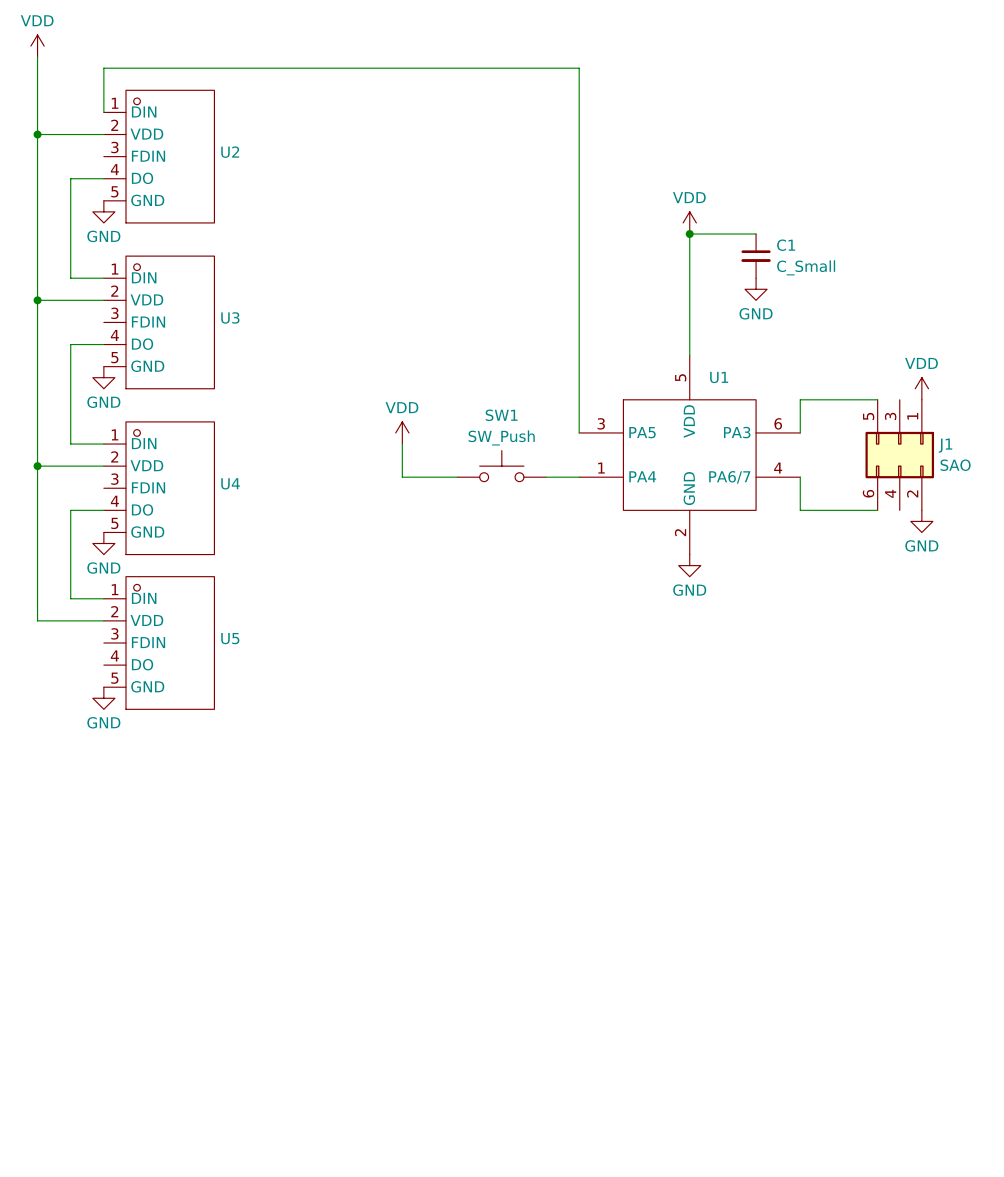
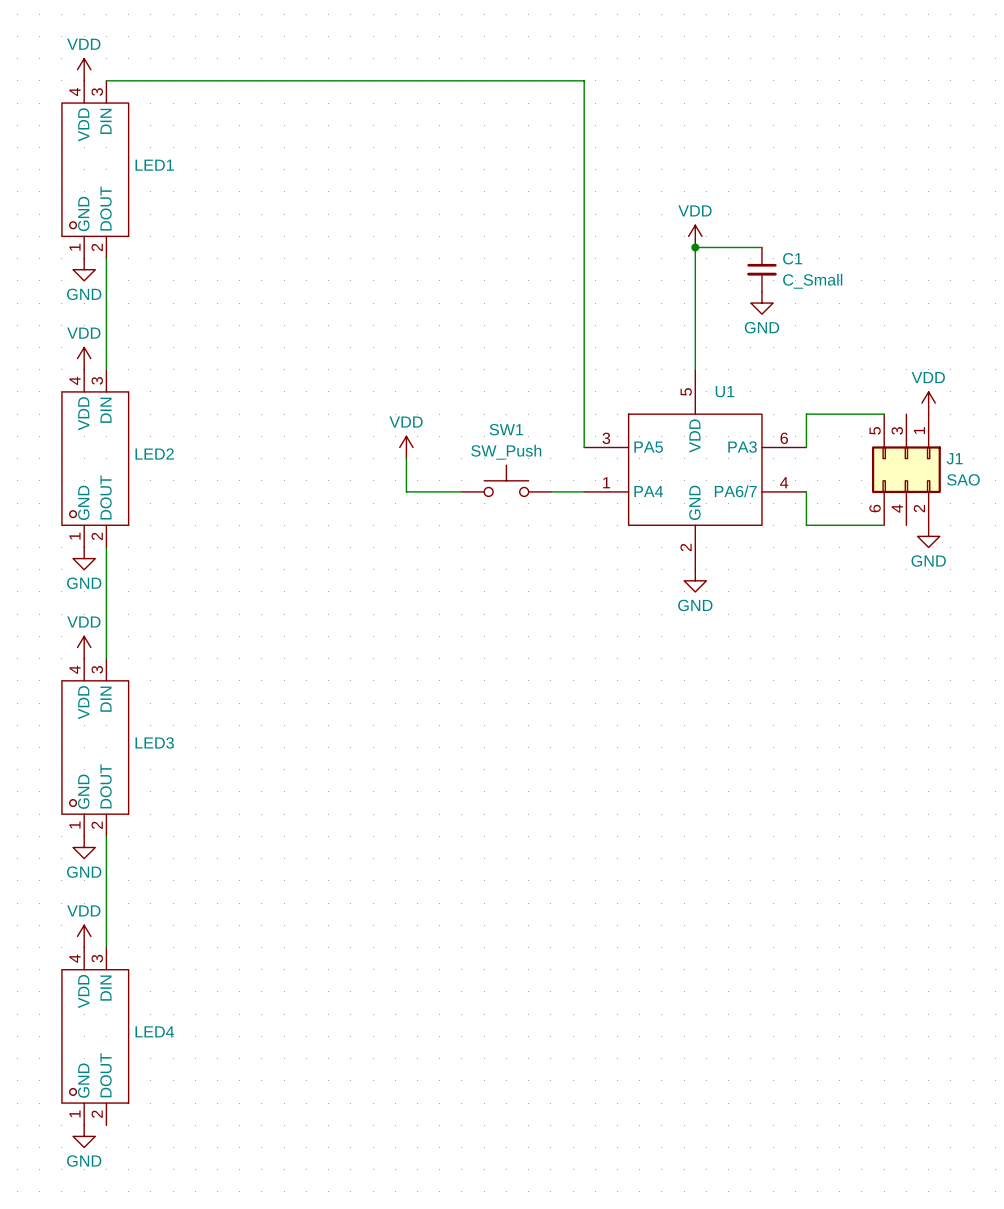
power symbol position: VDD (37, 46) -> VDD (84, 69)
wire: (37, 57) (37, 620) (103, 620) -> none
wire: (37, 134) (103, 134) -> none
junction: (37, 134) -> none
LED1: none -> (95, 169)
U2: (159, 156) -> none
wire: (103, 178) (70, 178) (70, 278) (103, 278) -> none
power symbol position: GND (103, 211) -> GND (84, 269)
wire: none -> (106, 258) (106, 369)
wire: (37, 300) (103, 300) -> none
junction: (37, 300) -> none
U3: (159, 322) -> none
power symbol: none -> VDD (84, 358)
wire: (103, 344) (70, 344) (70, 444) (103, 444) -> none
power symbol: GND (103, 377) -> none
LED2: none -> (95, 458)
wire: (37, 466) (103, 466) -> none
junction: (37, 466) -> none
U4: (159, 488) -> none
wire: (103, 510) (70, 510) (70, 598) (103, 598) -> none
wire: none -> (106, 547) (106, 658)
power symbol position: GND (103, 543) -> GND (84, 558)
power symbol: none -> VDD (84, 647)
U5: (159, 642) -> none
power symbol: GND (103, 698) -> none
LED3: none -> (95, 747)
wire: none -> (106, 836) (106, 947)
power symbol: none -> GND (84, 847)
power symbol: none -> VDD (84, 936)
LED4: none -> (95, 1036)
power symbol: none -> GND (84, 1136)

